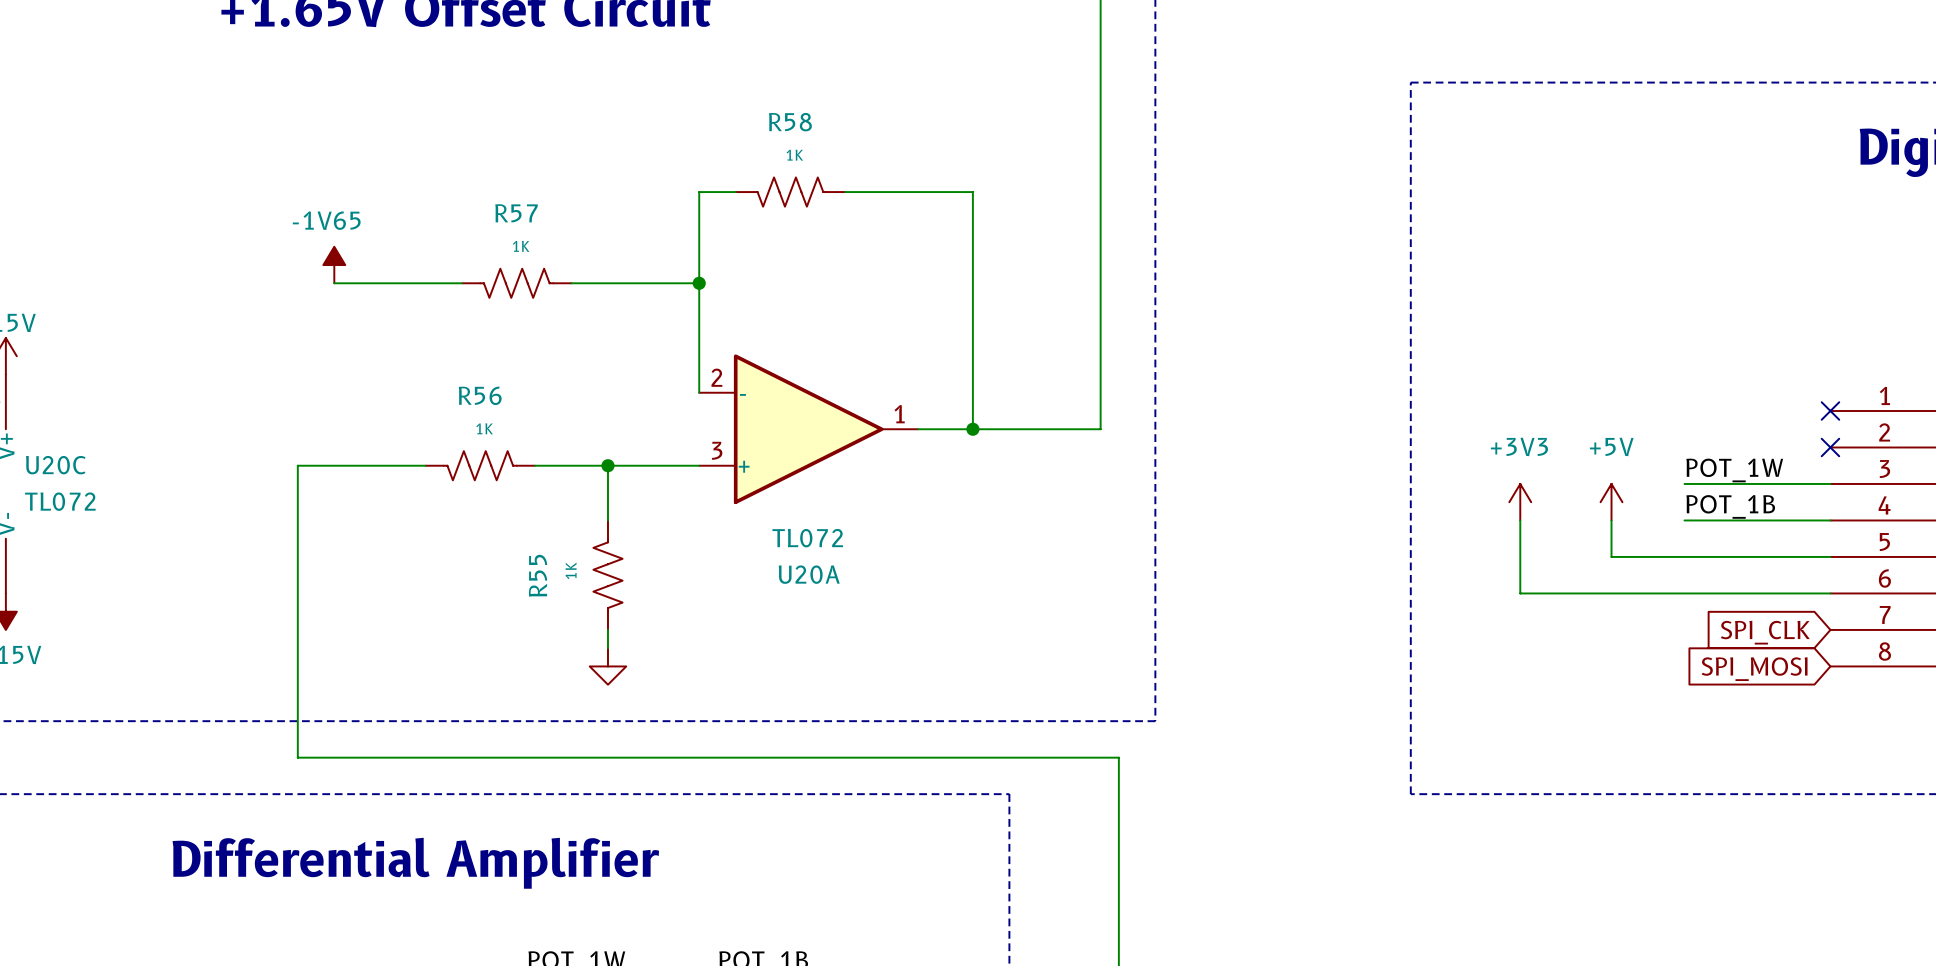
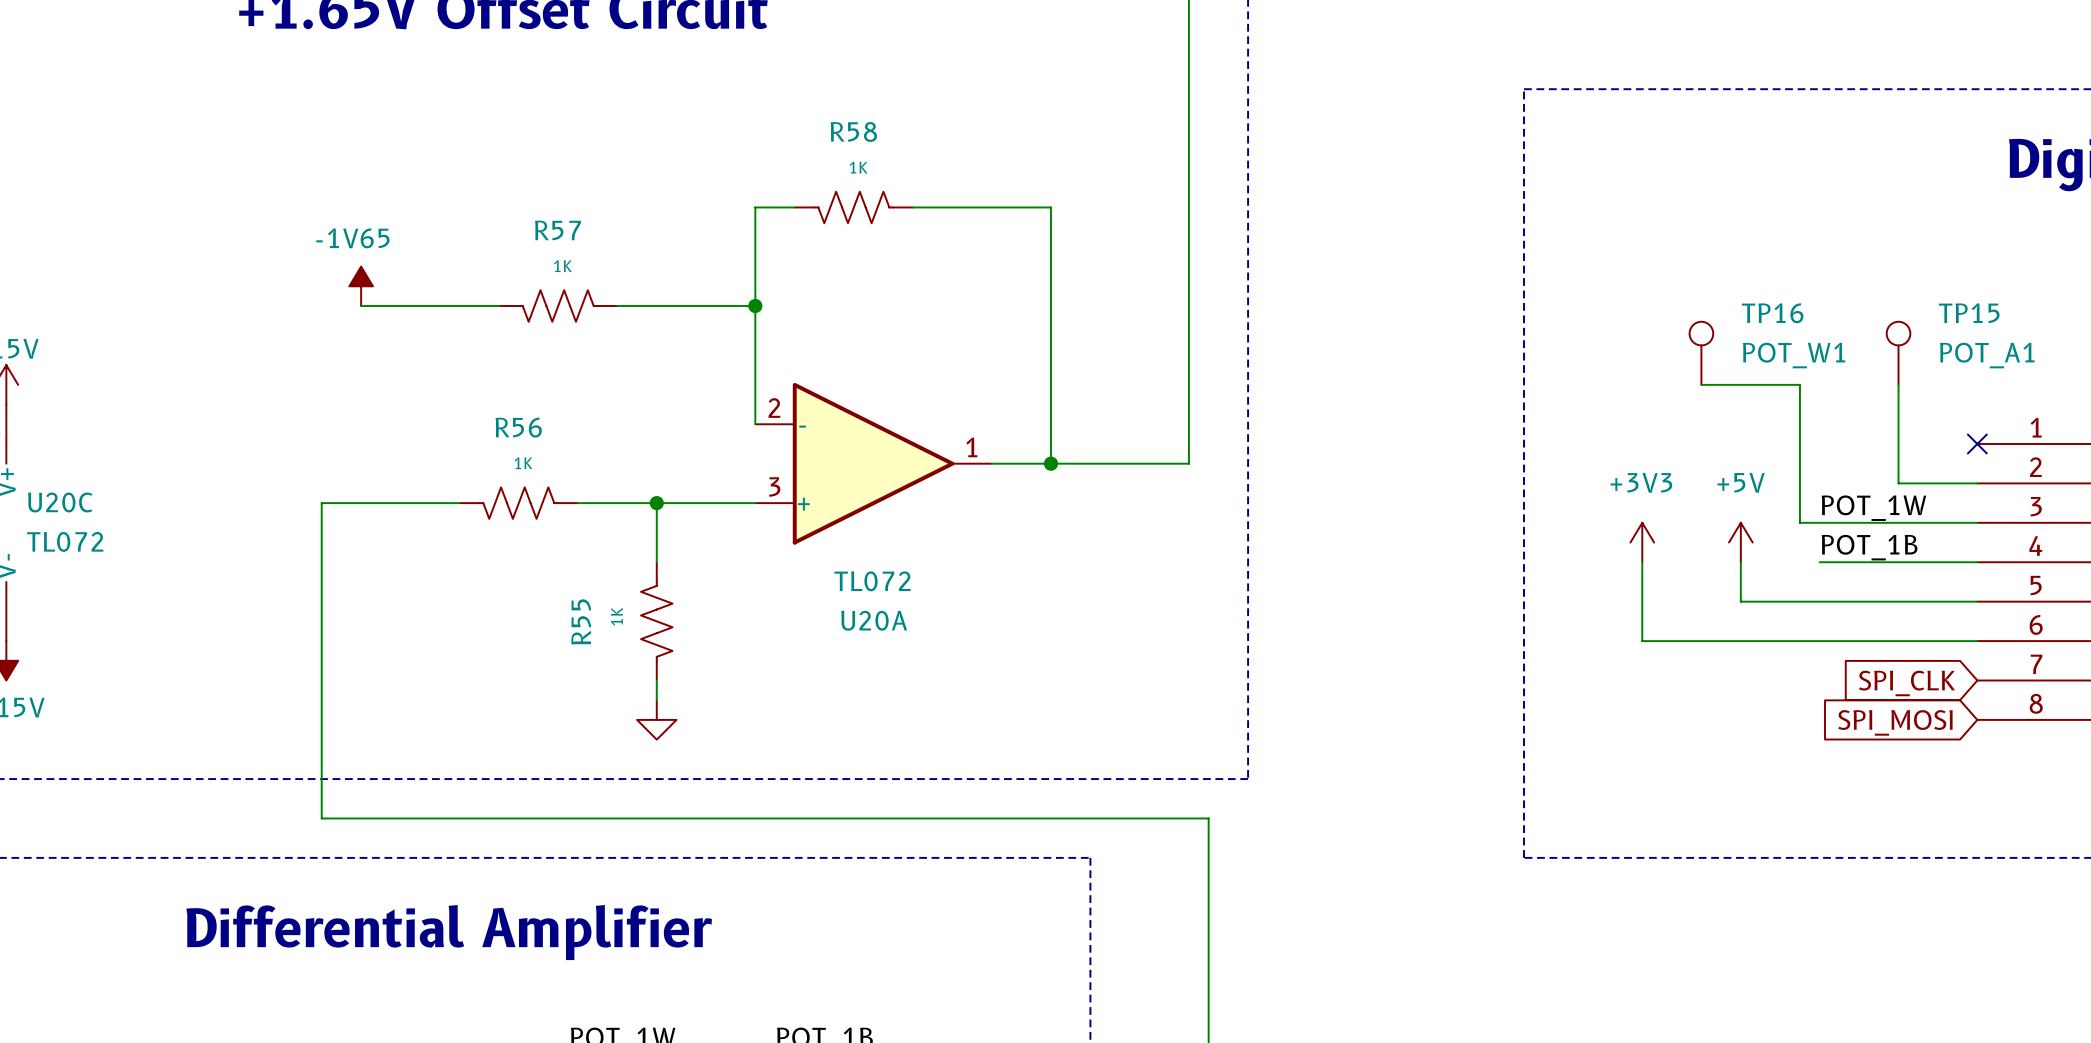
TP16: none -> POT_W1 (1701, 353)
TP15: none -> POT_A1 (1898, 353)
wire: none -> (1701, 384) (1799, 384) (1799, 522) (1819, 522)
wire: none -> (1898, 384) (1898, 483) (1977, 483)
no-connect mark: (1830, 447) -> none

